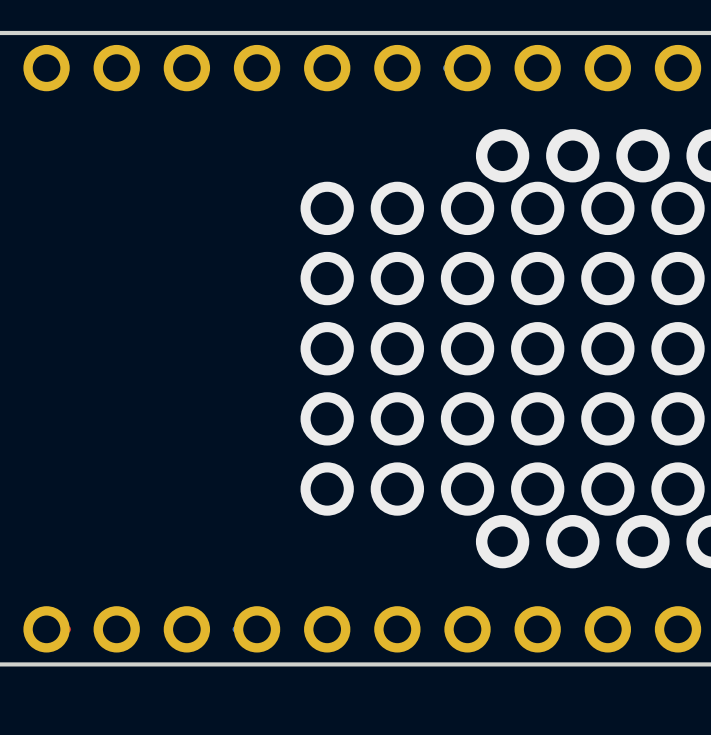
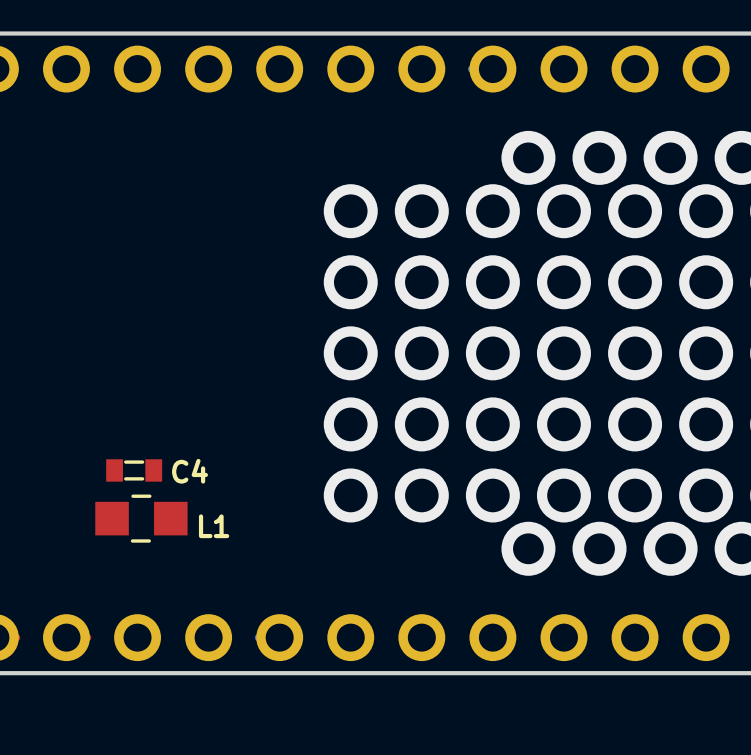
C4: none -> (134, 470)
L1: none -> (141, 518)

